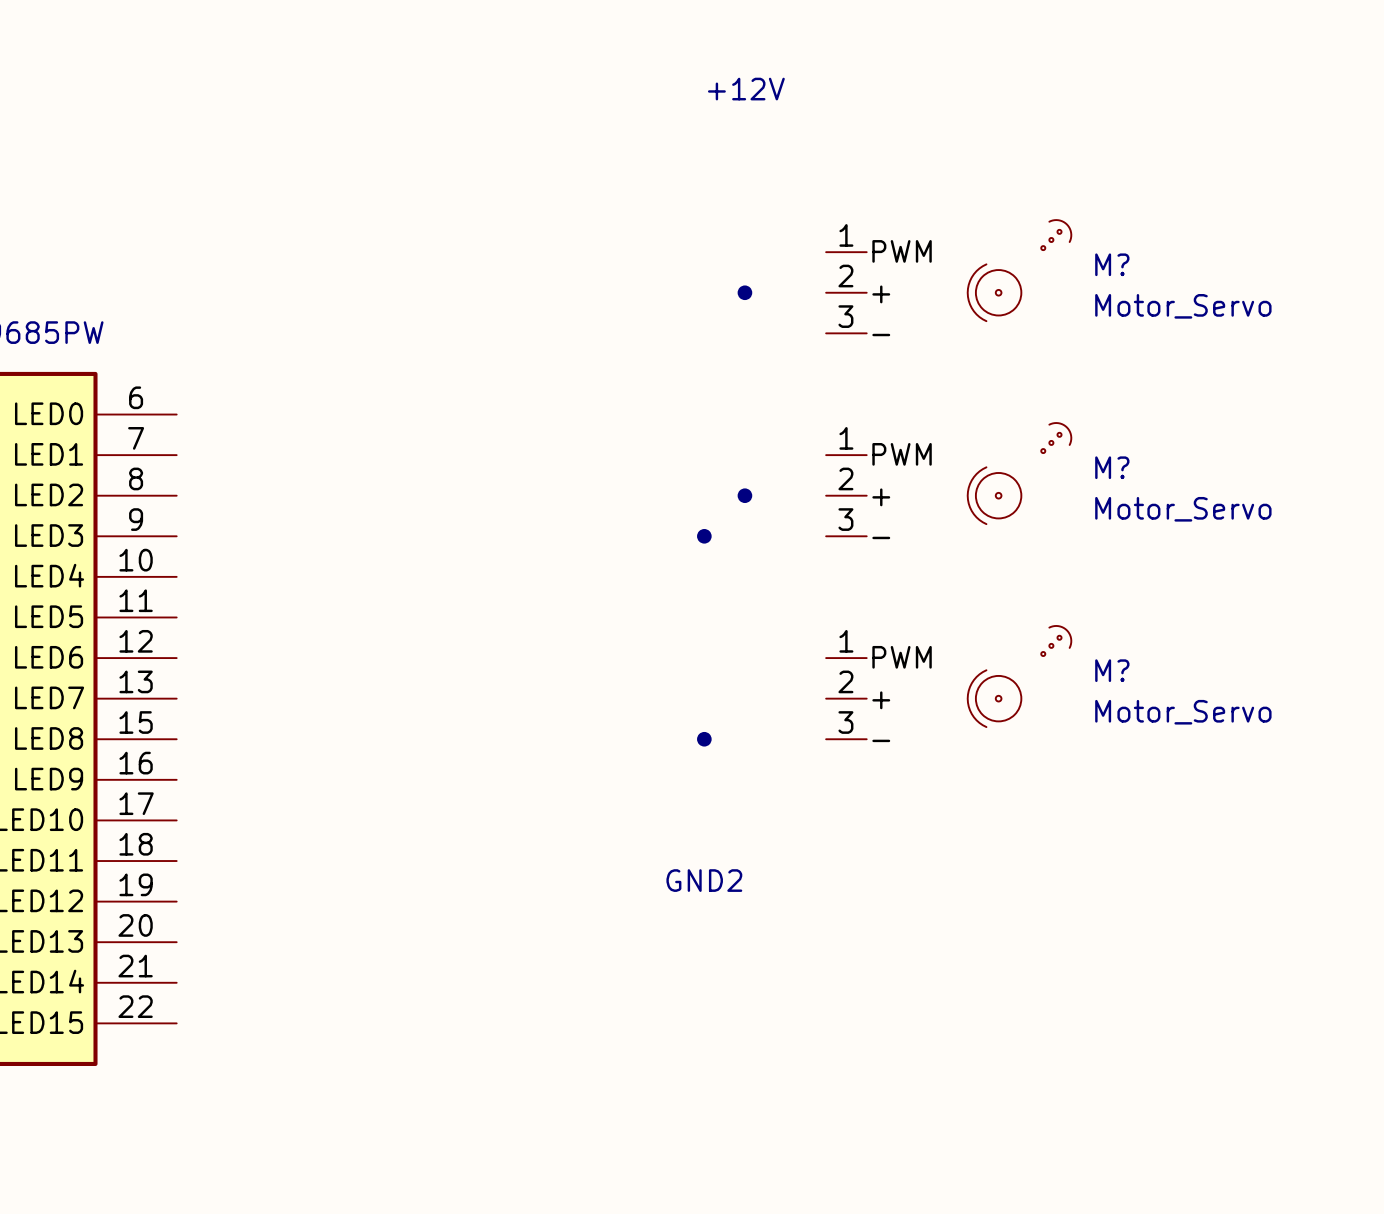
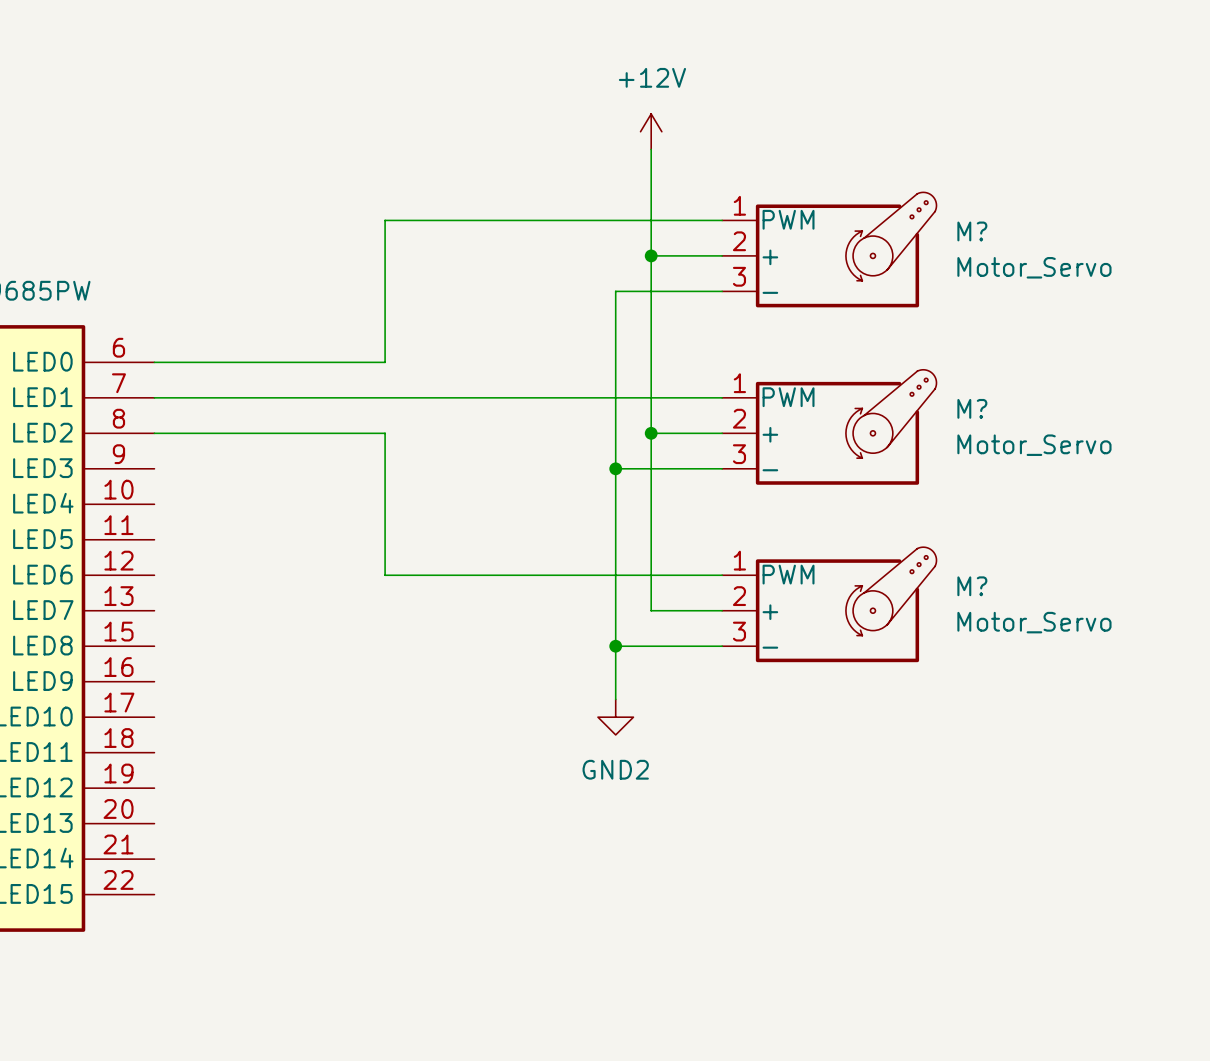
power symbol: none -> +12V (651, 131)
wire: none -> (651, 149) (651, 610) (722, 610)
M? symbol: [826, 220, 1072, 334] -> [722, 192, 937, 308]
wire: none -> (722, 220) (385, 220) (385, 362) (154, 362)
wire: none -> (651, 255) (722, 255)
wire: none -> (722, 291) (615, 291) (615, 699)
M? symbol: [826, 423, 1072, 537] -> [722, 369, 937, 485]
wire: none -> (154, 397) (722, 397)
wire: none -> (154, 433) (385, 433) (385, 575) (722, 575)
wire: none -> (651, 433) (722, 433)
wire: none -> (615, 468) (722, 468)
M? symbol: [826, 625, 1072, 740] -> [722, 547, 937, 663]
wire: none -> (615, 646) (722, 646)
power symbol: none -> GND2 (615, 717)

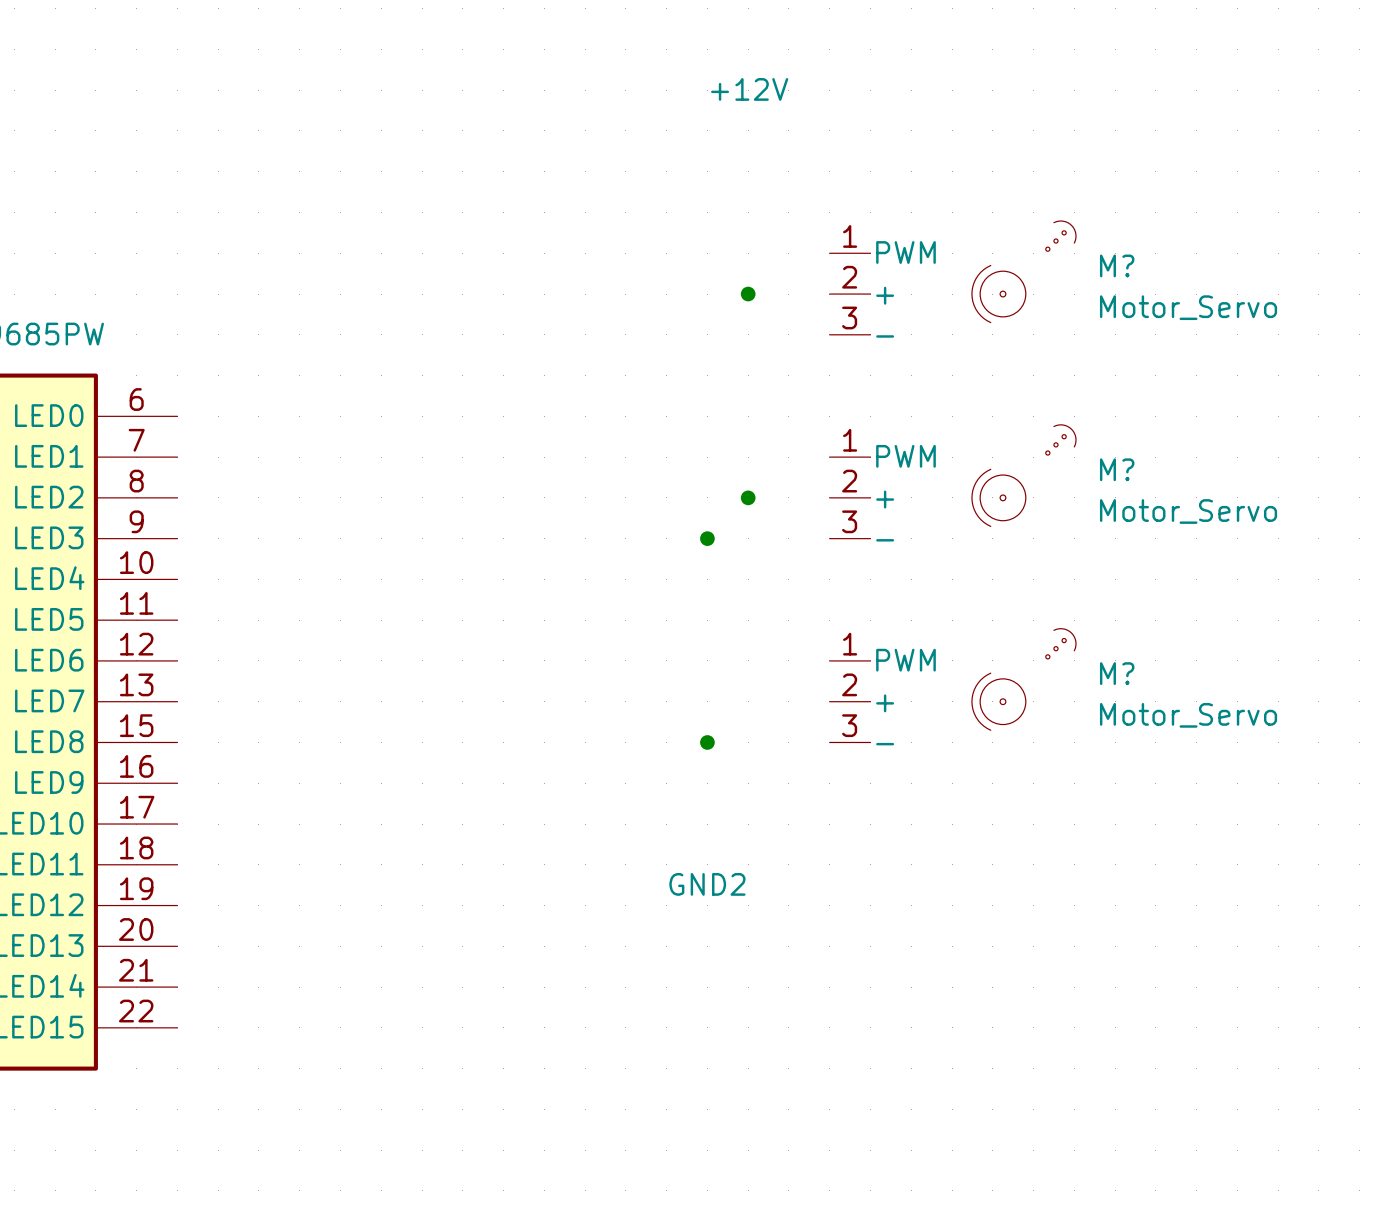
power symbol: +12V (651, 131) -> none
wire: (651, 149) (651, 610) (722, 610) -> none
M? symbol: [722, 192, 937, 308] -> [829, 221, 1077, 335]
wire: (722, 220) (385, 220) (385, 362) (154, 362) -> none
wire: (651, 255) (722, 255) -> none
wire: (722, 291) (615, 291) (615, 699) -> none
M? symbol: [722, 369, 937, 485] -> [829, 424, 1077, 539]
wire: (154, 397) (722, 397) -> none
wire: (154, 433) (385, 433) (385, 575) (722, 575) -> none
wire: (651, 433) (722, 433) -> none
wire: (615, 468) (722, 468) -> none
M? symbol: [722, 547, 937, 663] -> [829, 628, 1077, 743]
wire: (615, 646) (722, 646) -> none
power symbol: GND2 (615, 717) -> none

